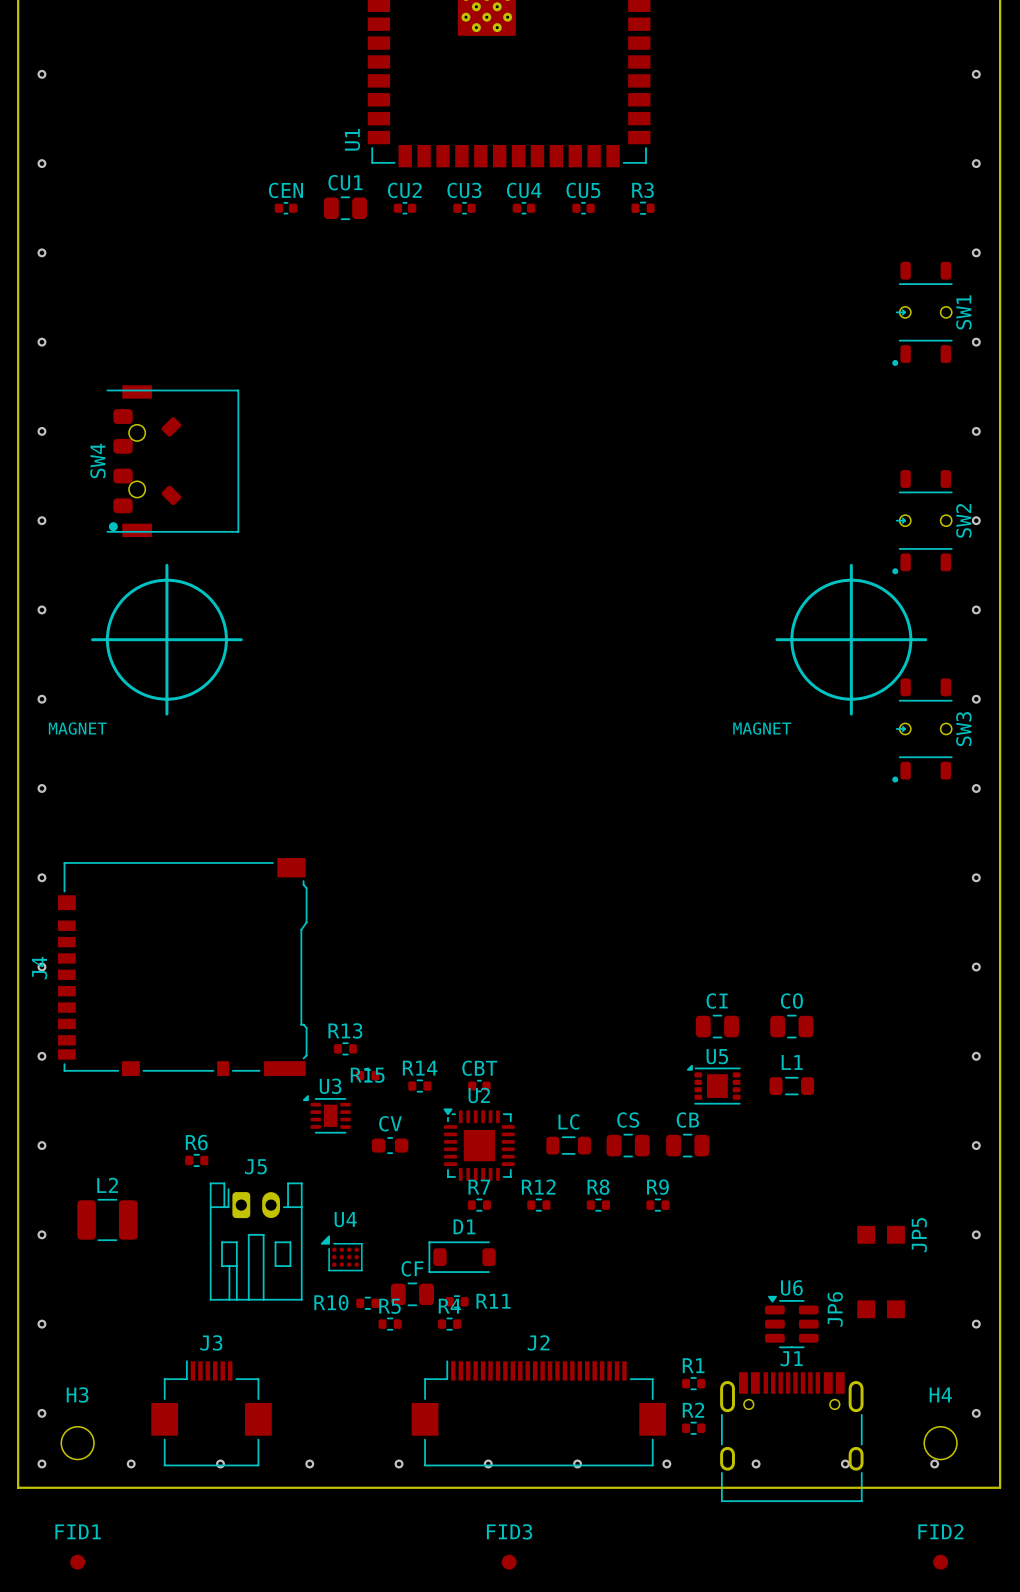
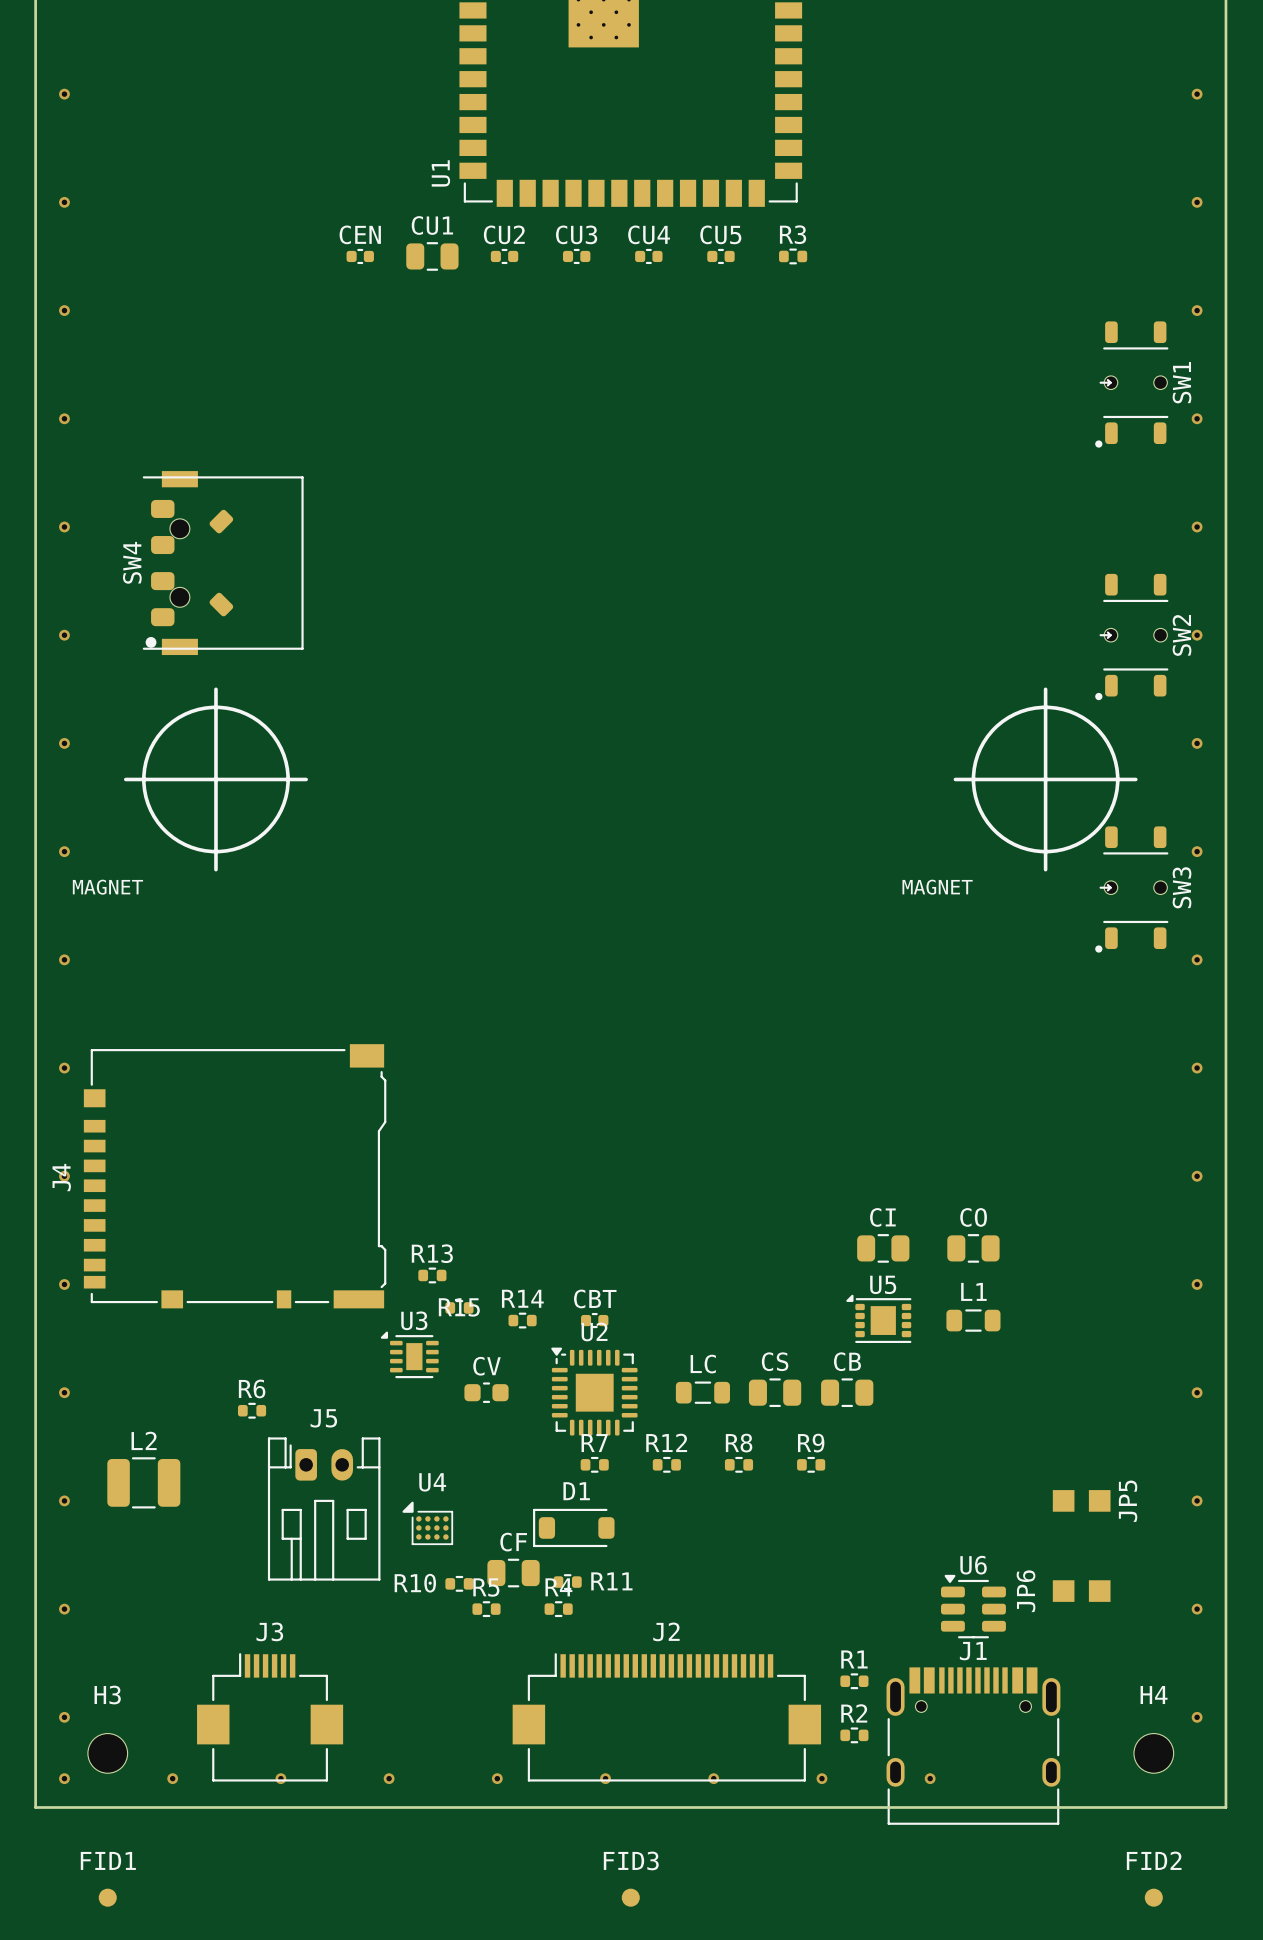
via: (845, 1463) -> none
via: (934, 1463) -> none

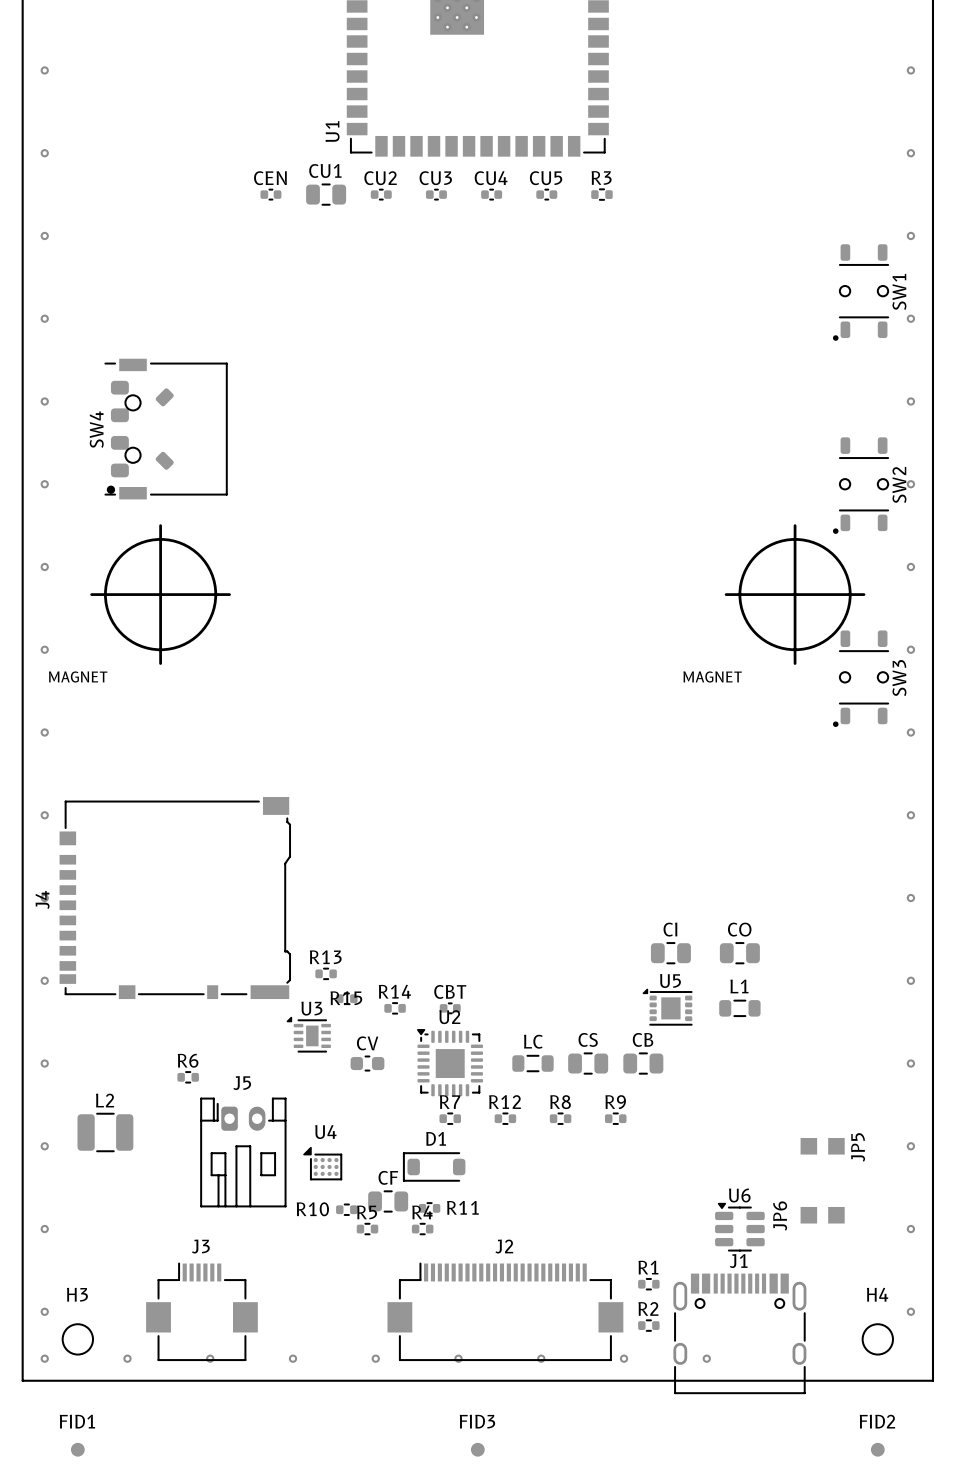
SW1 footprint: [1095, 321, 1169, 448] -> [832, 244, 889, 341]
SW4 footprint: [142, 471, 304, 656] -> [104, 358, 228, 500]
SW2 footprint: [1095, 573, 1169, 701] -> [832, 437, 889, 534]
SW3 footprint: [1095, 826, 1169, 953] -> [832, 630, 889, 727]

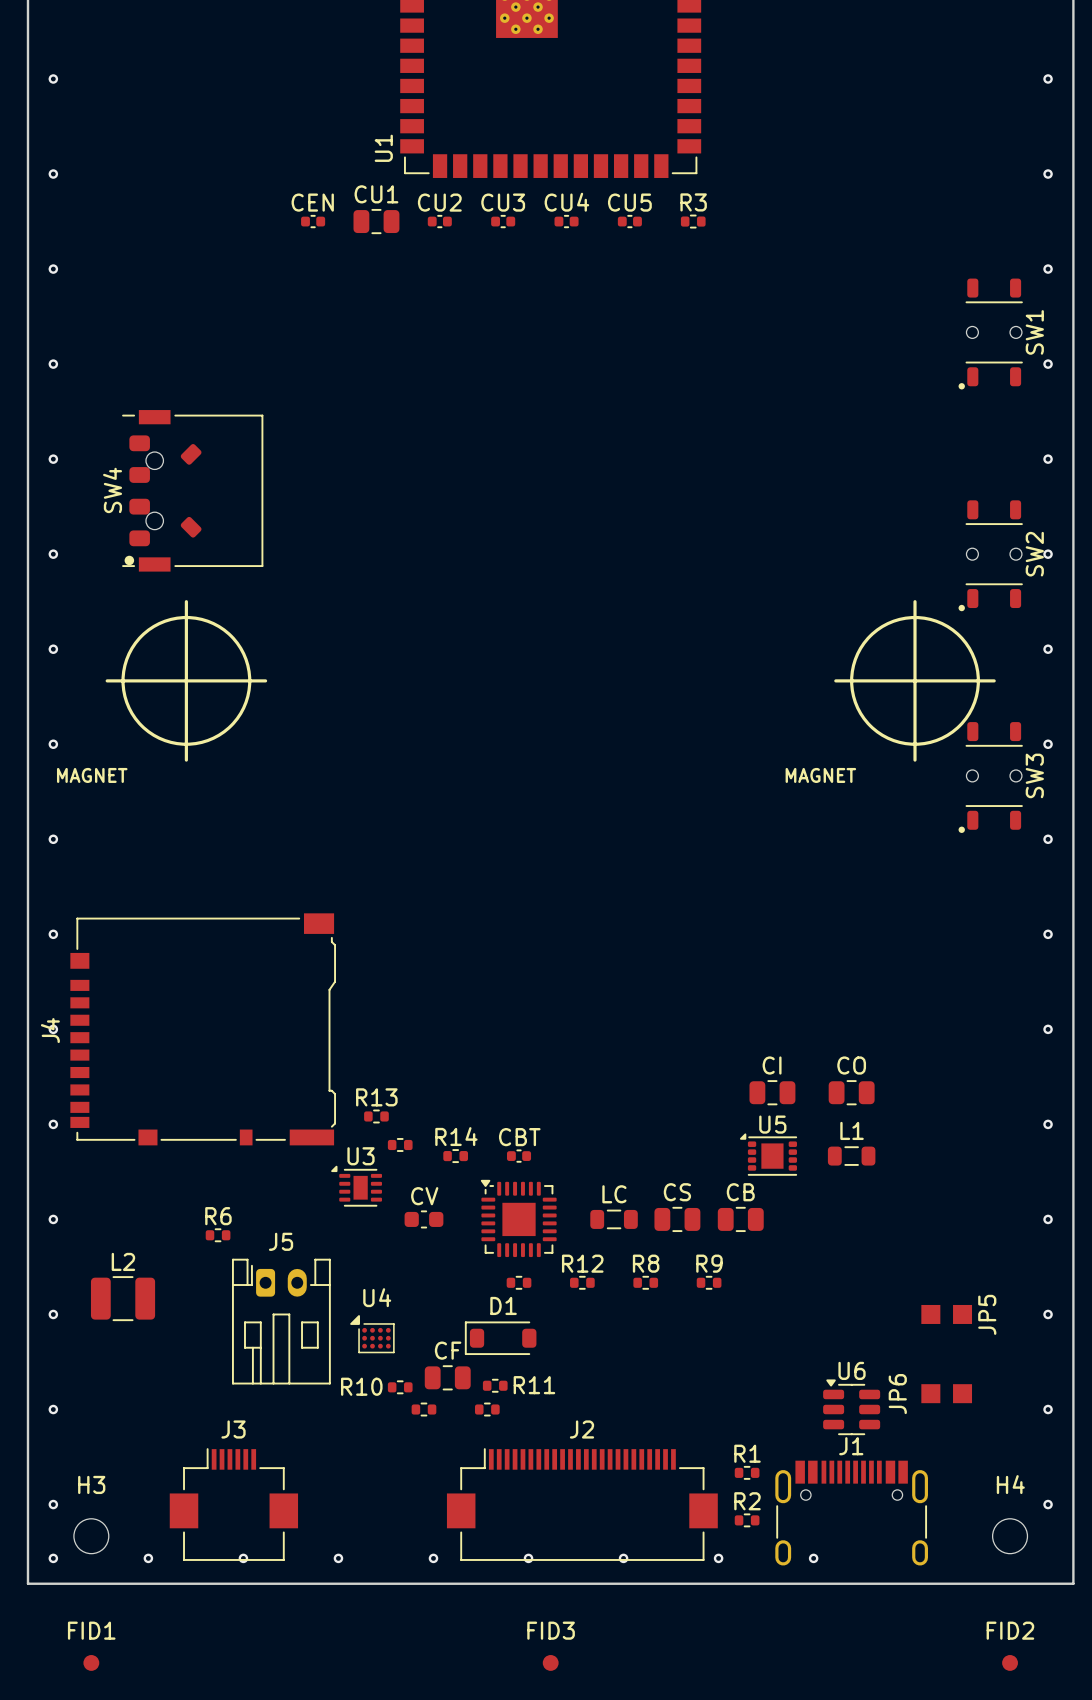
R15 name: R15 (346, 998) -> none
U2 name: U2 (449, 1017) -> none
R7 name: R7 (450, 1102) -> none
R5 name: R5 (367, 1212) -> none
R4 name: R4 (422, 1212) -> none
J1 footprint: [673, 1273, 807, 1395] -> [775, 1460, 928, 1566]

